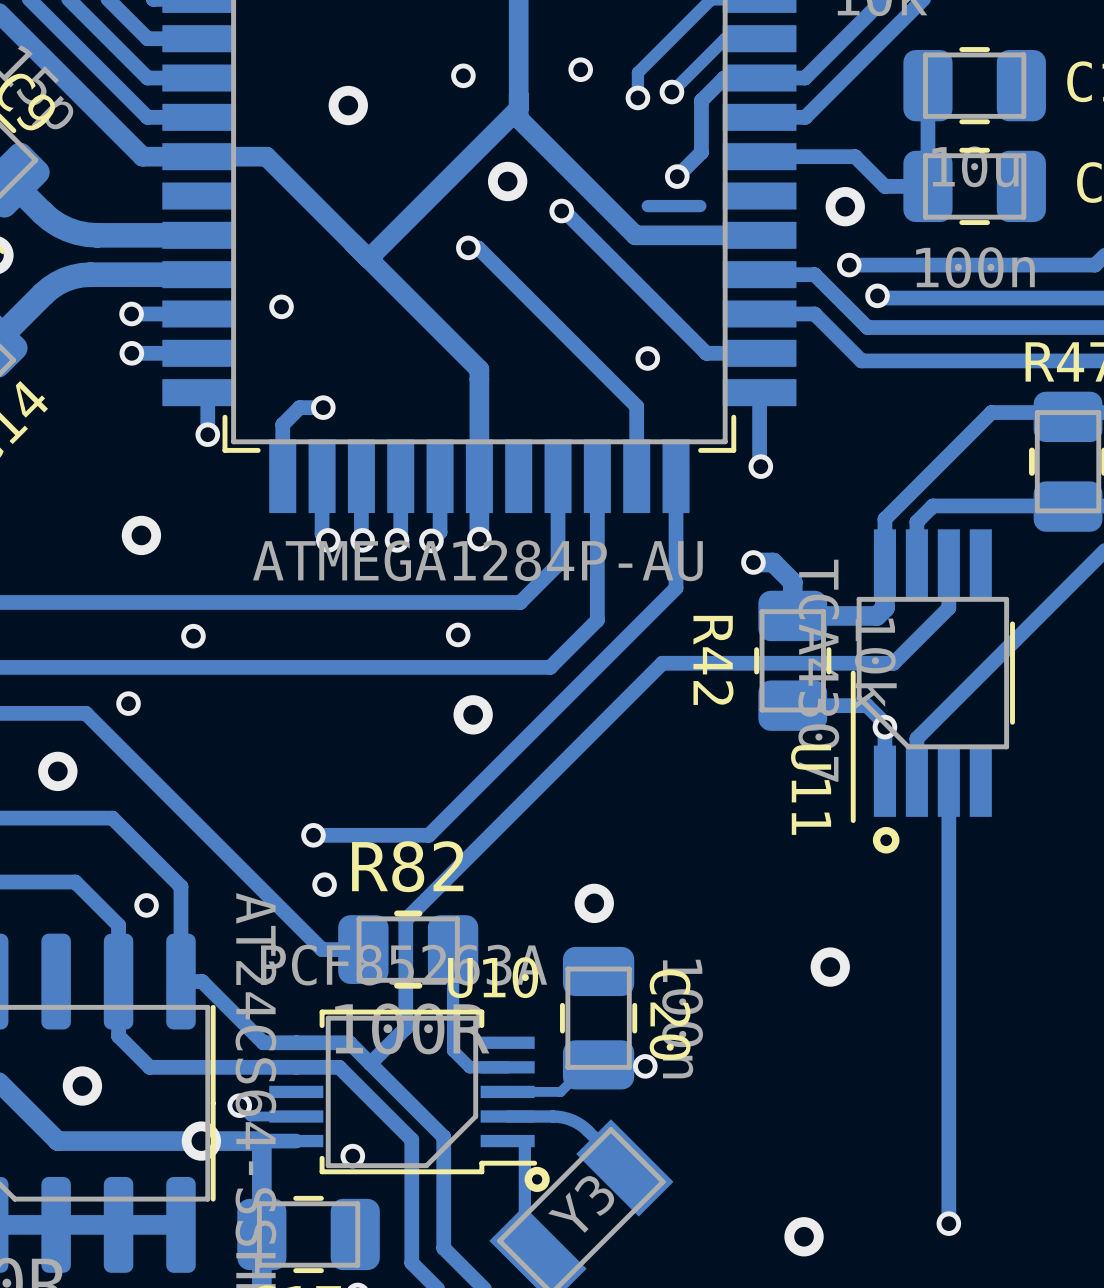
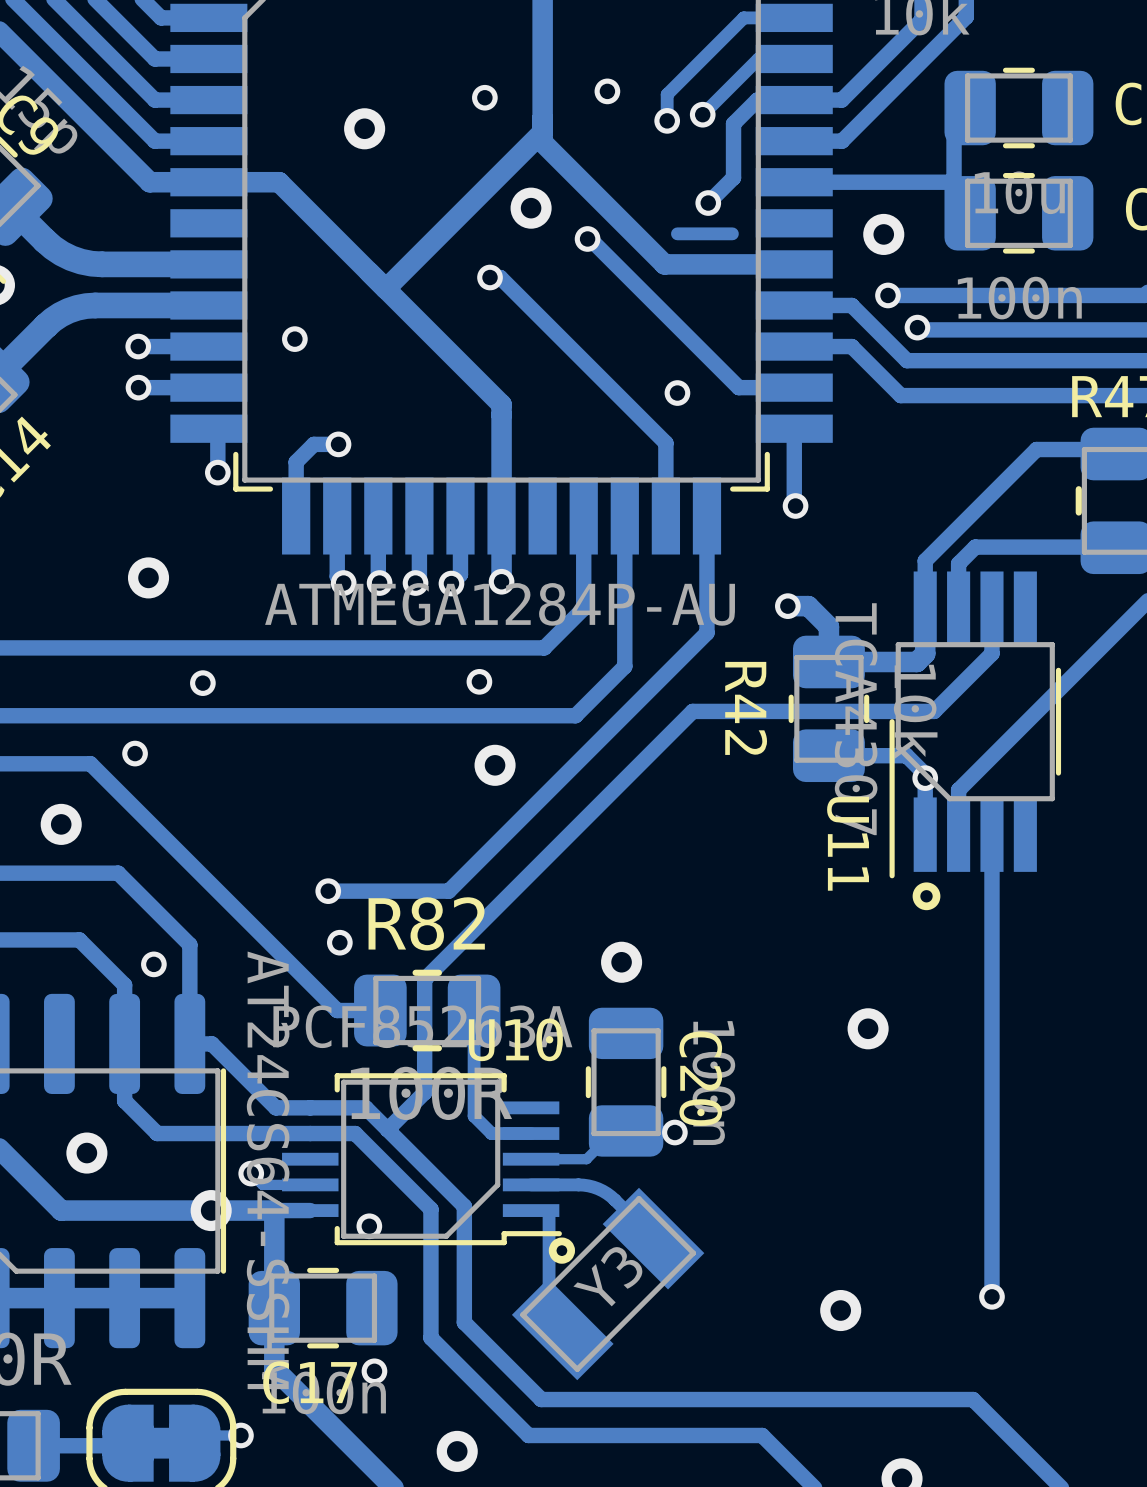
track: (927, 85) (927, 186) (884, 186) (855, 156) -> (954, 108) (954, 182) (894, 182)

